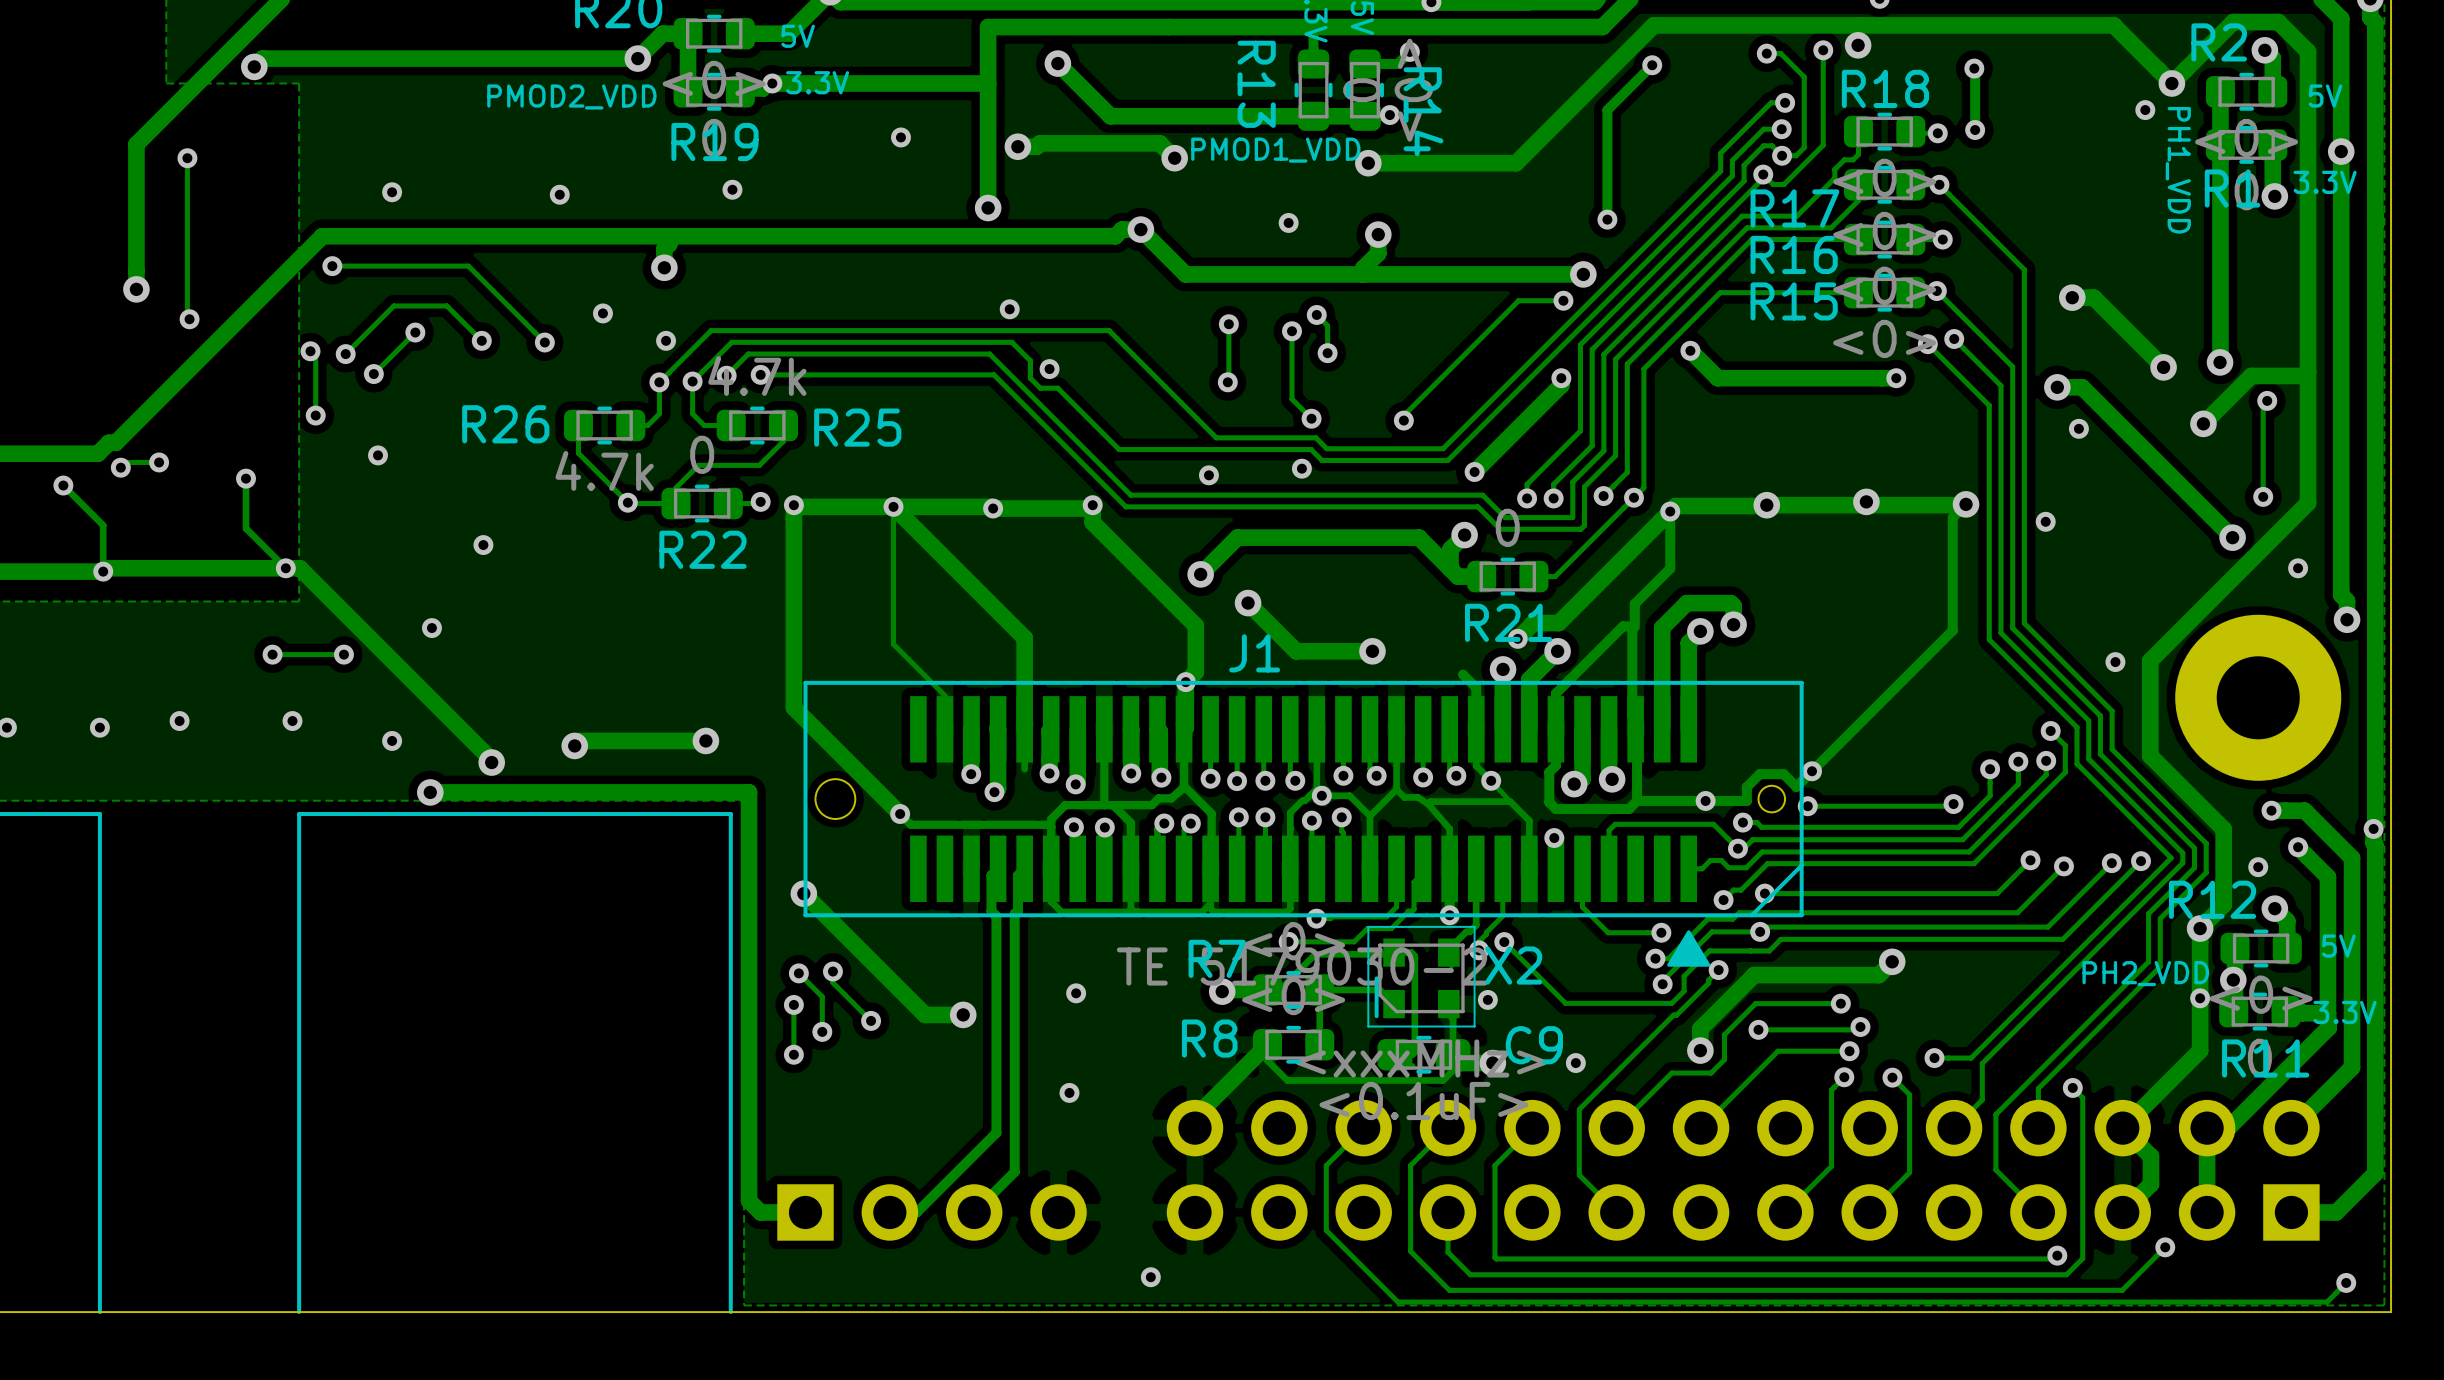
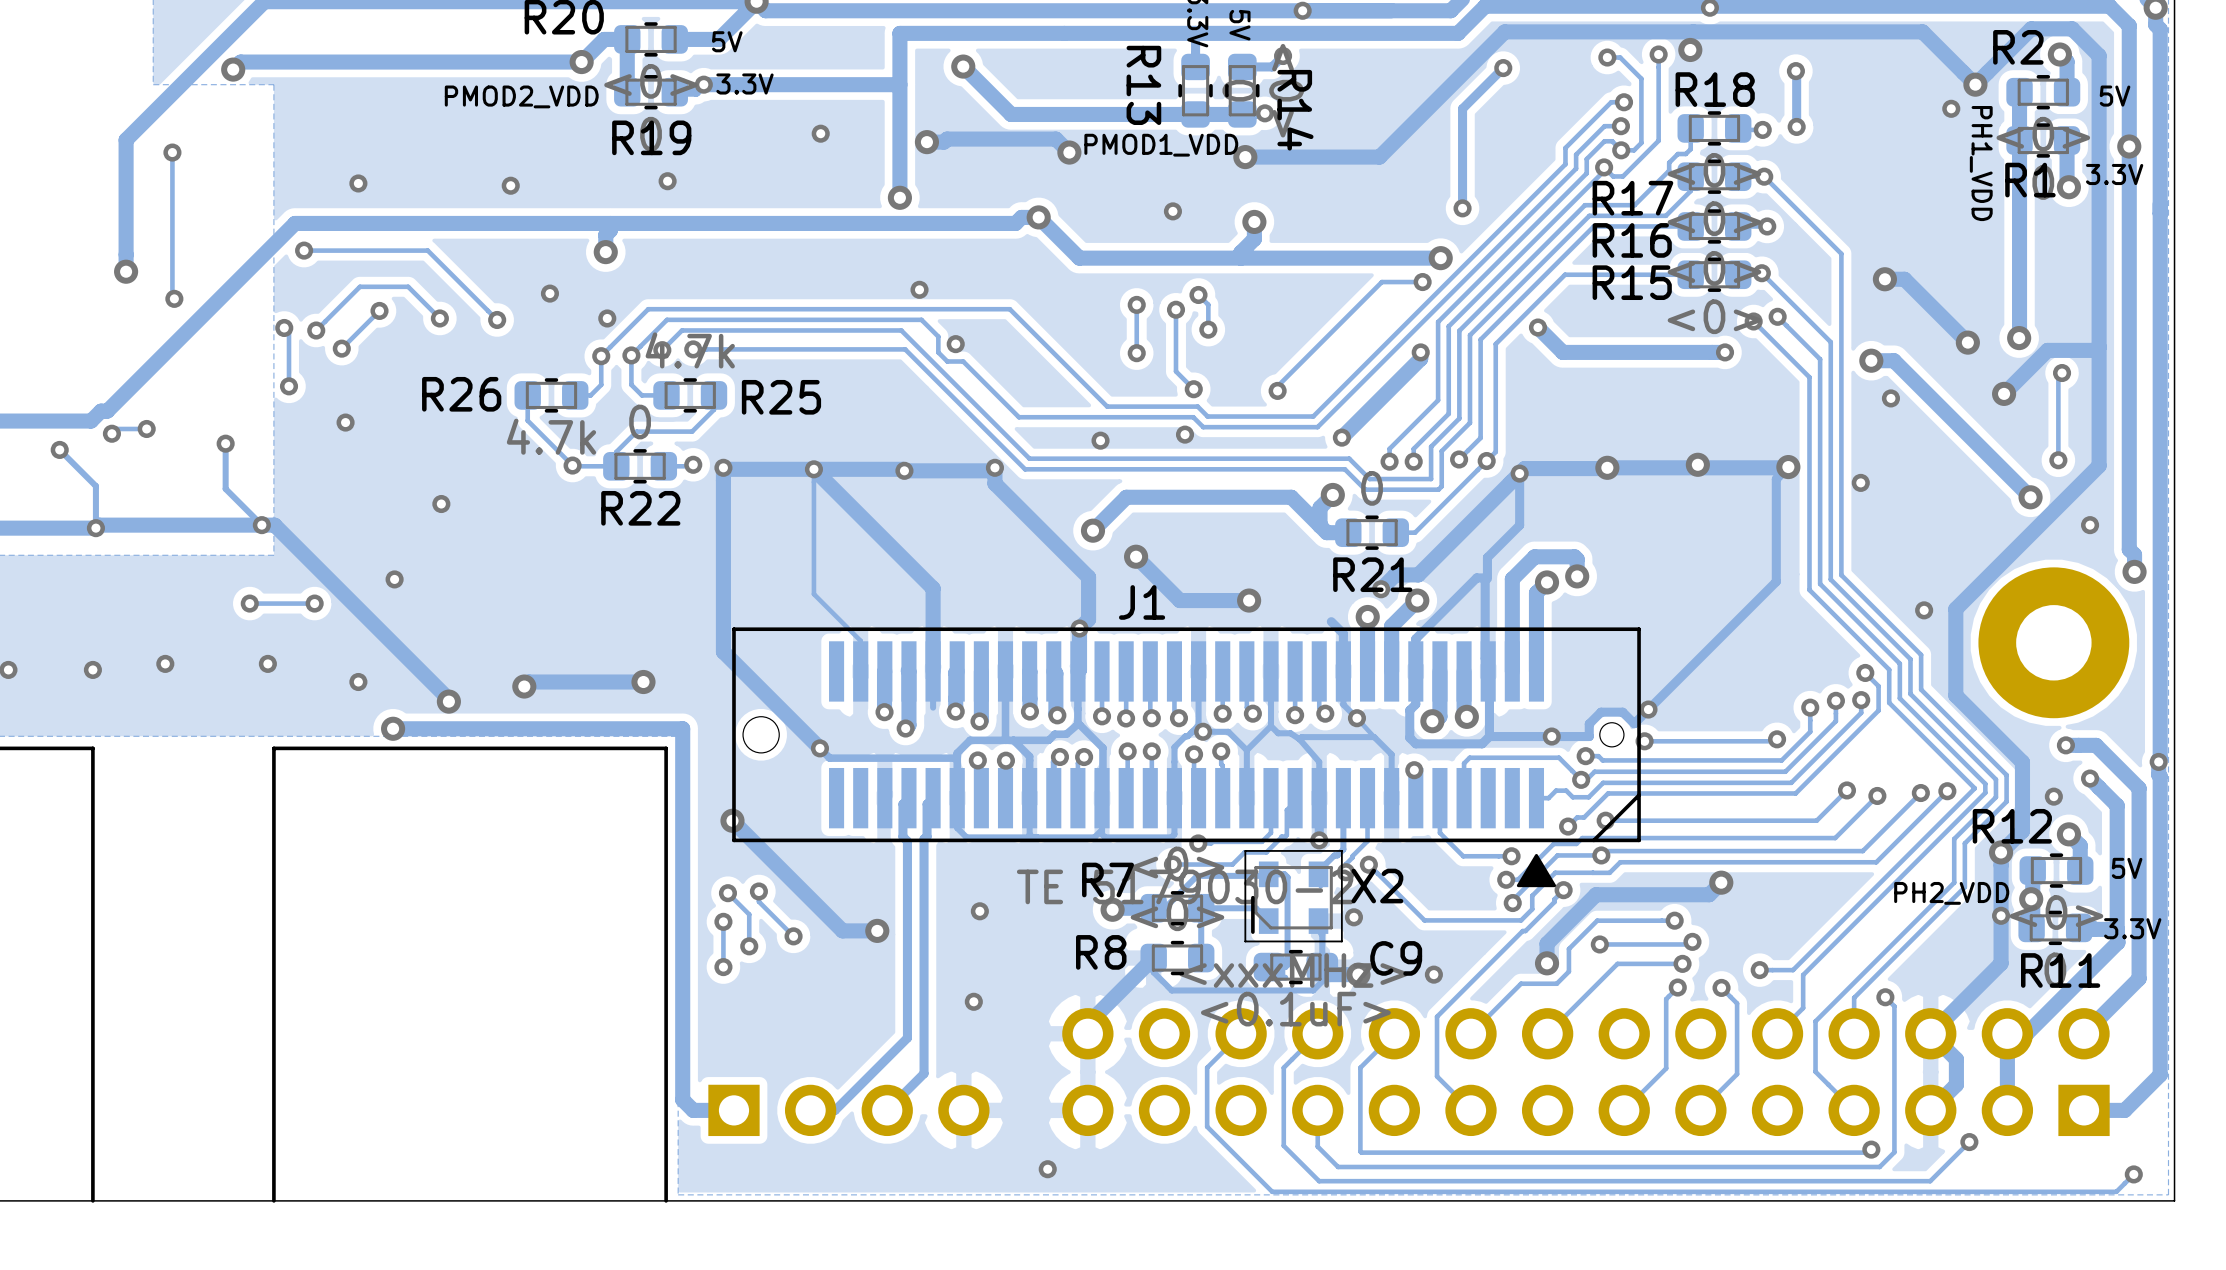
track: (1228, 324) (1227, 382) -> none
via position: (1228, 324) -> (1136, 304)
track: none -> (1136, 304) (1136, 353)
via position: (1227, 382) -> (1136, 353)

